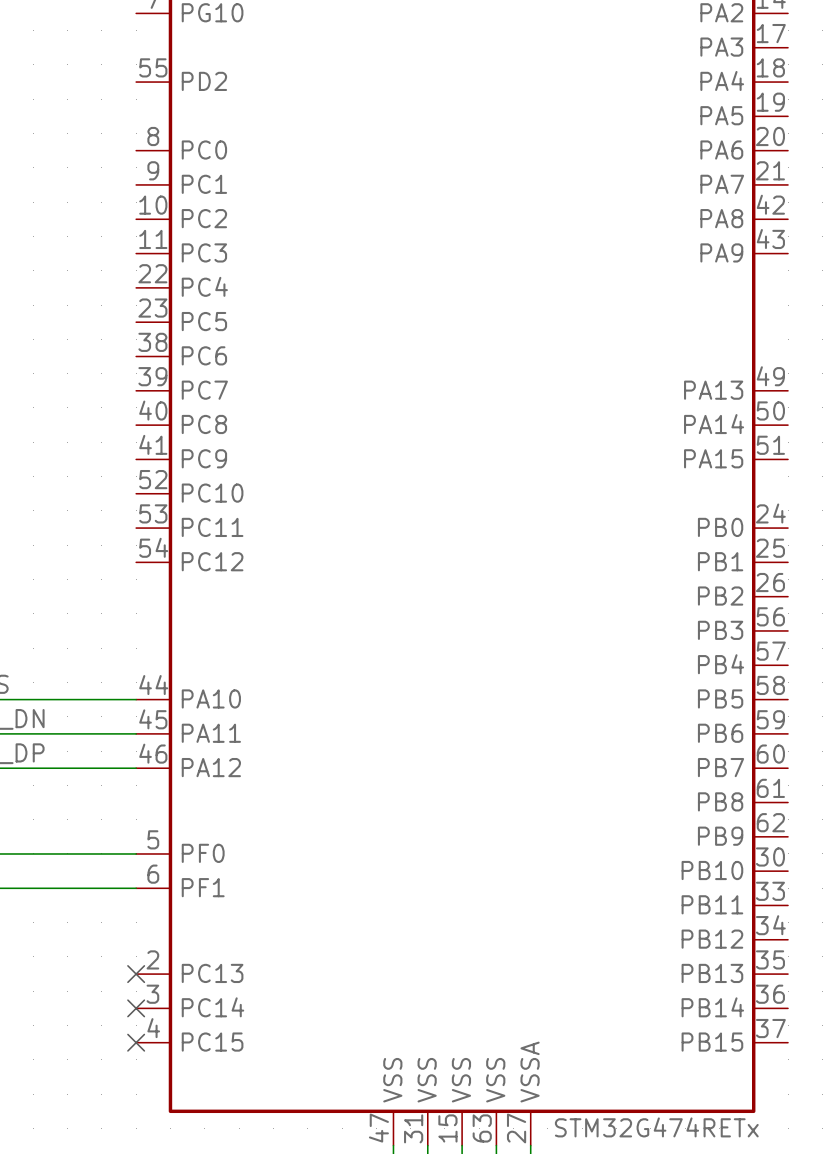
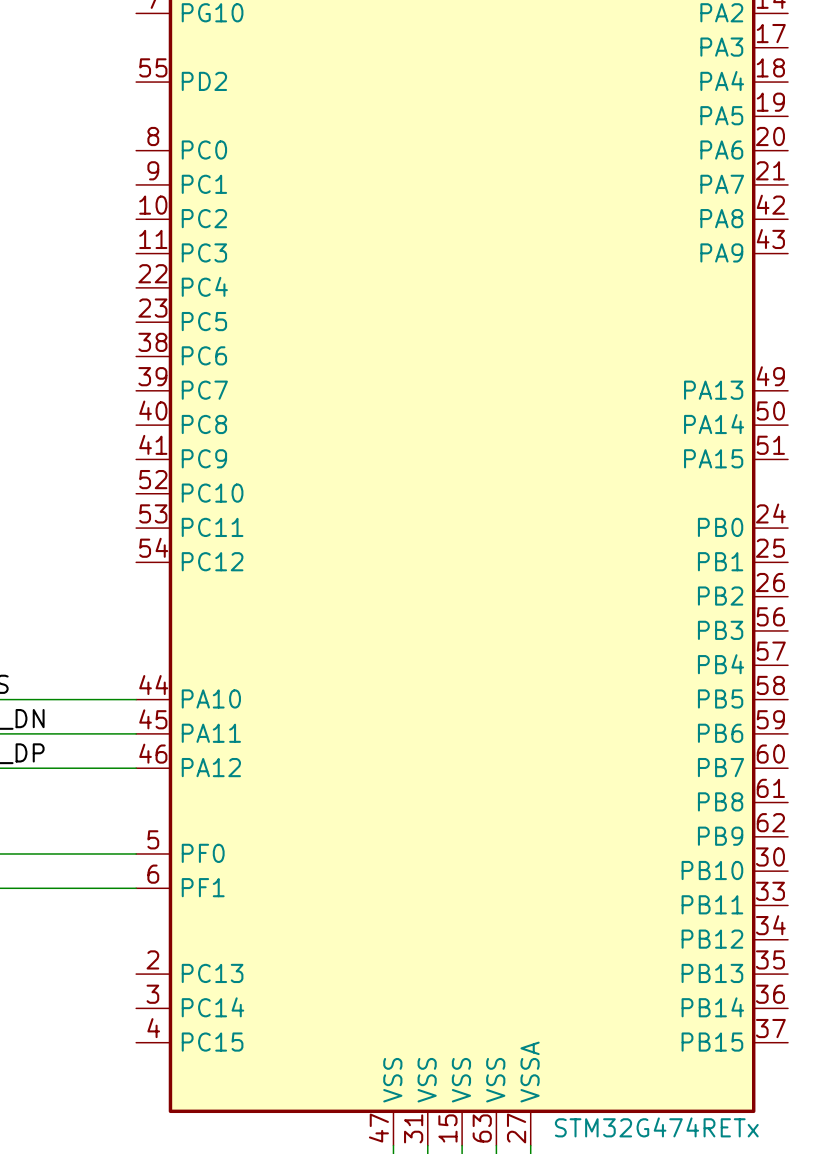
no-connect mark: (136, 974) -> none
no-connect mark: (136, 1008) -> none
no-connect mark: (136, 1042) -> none

